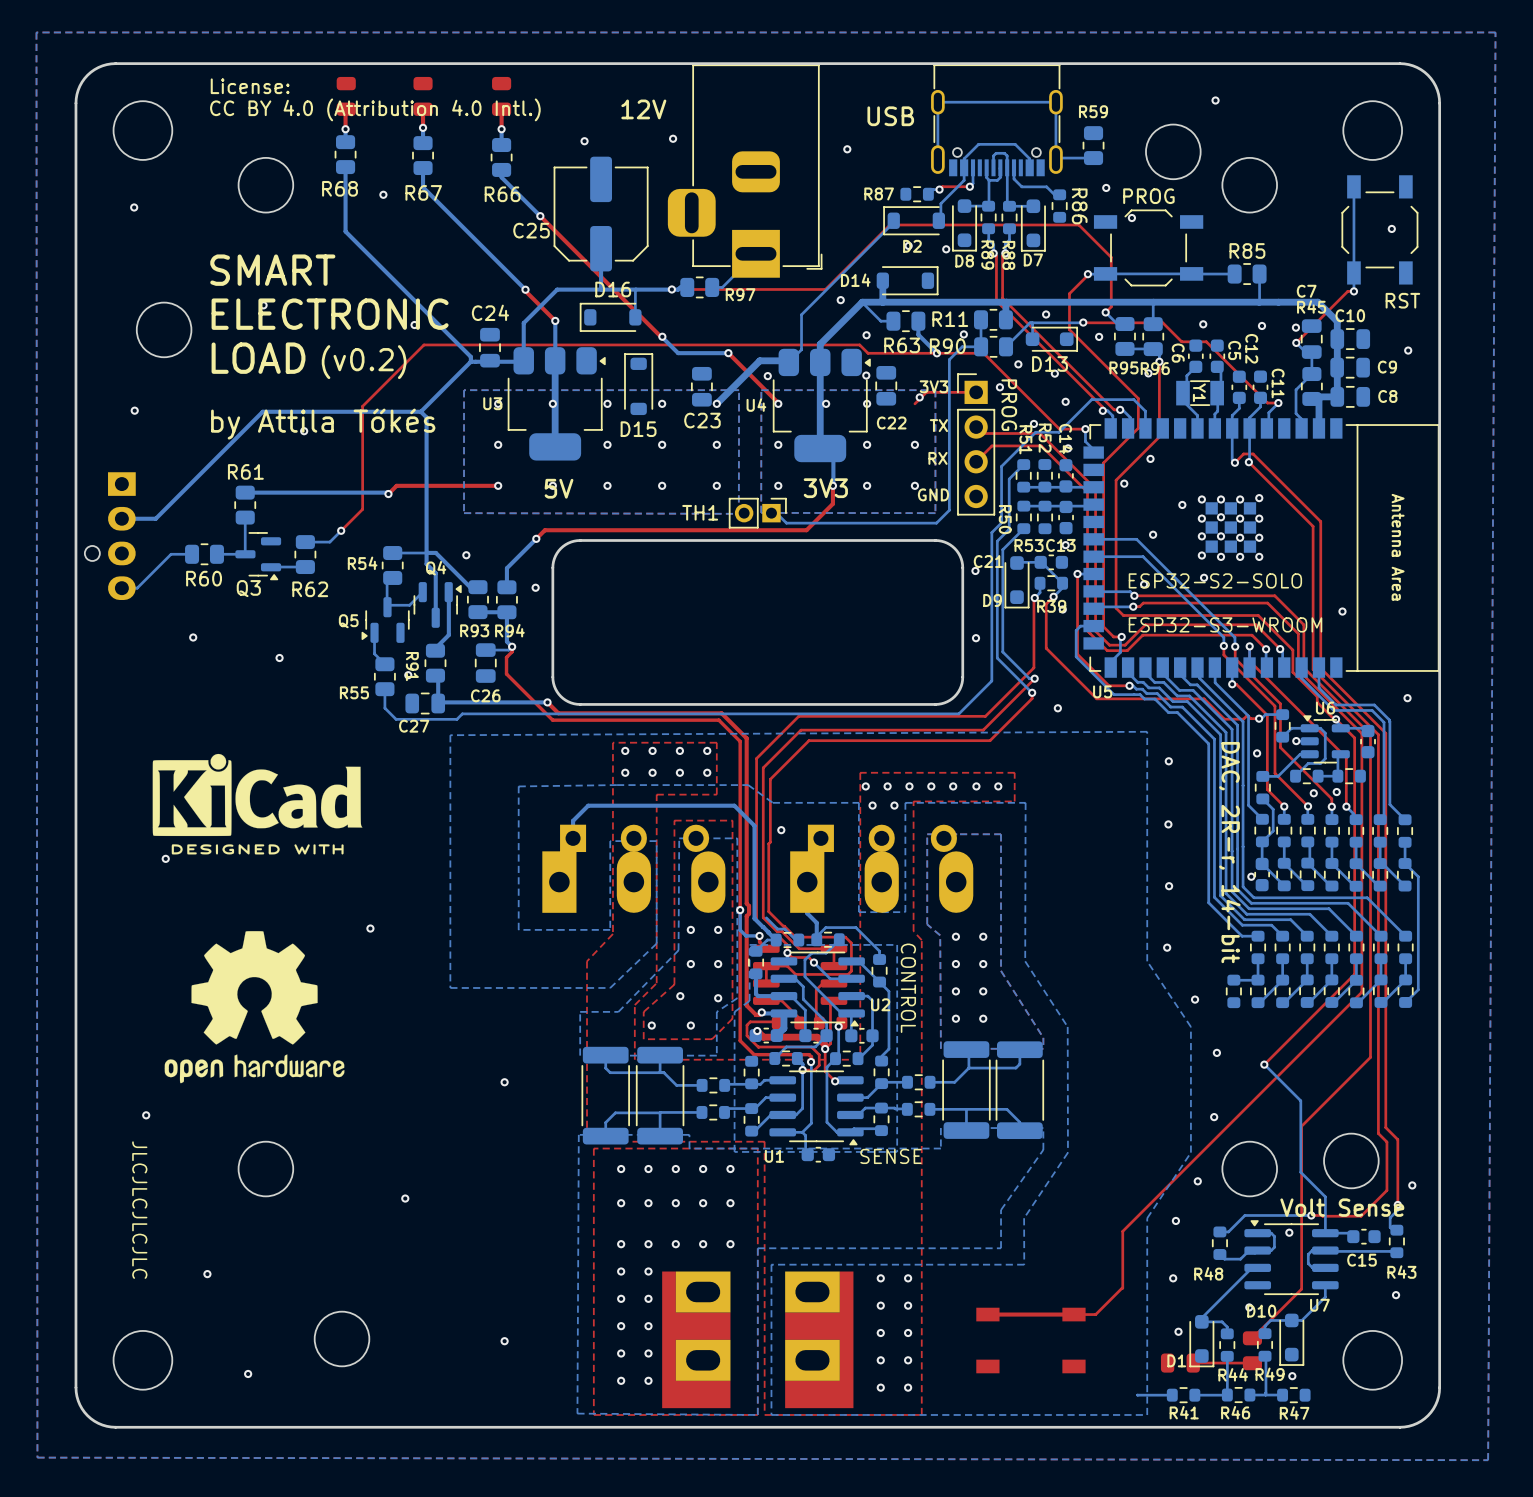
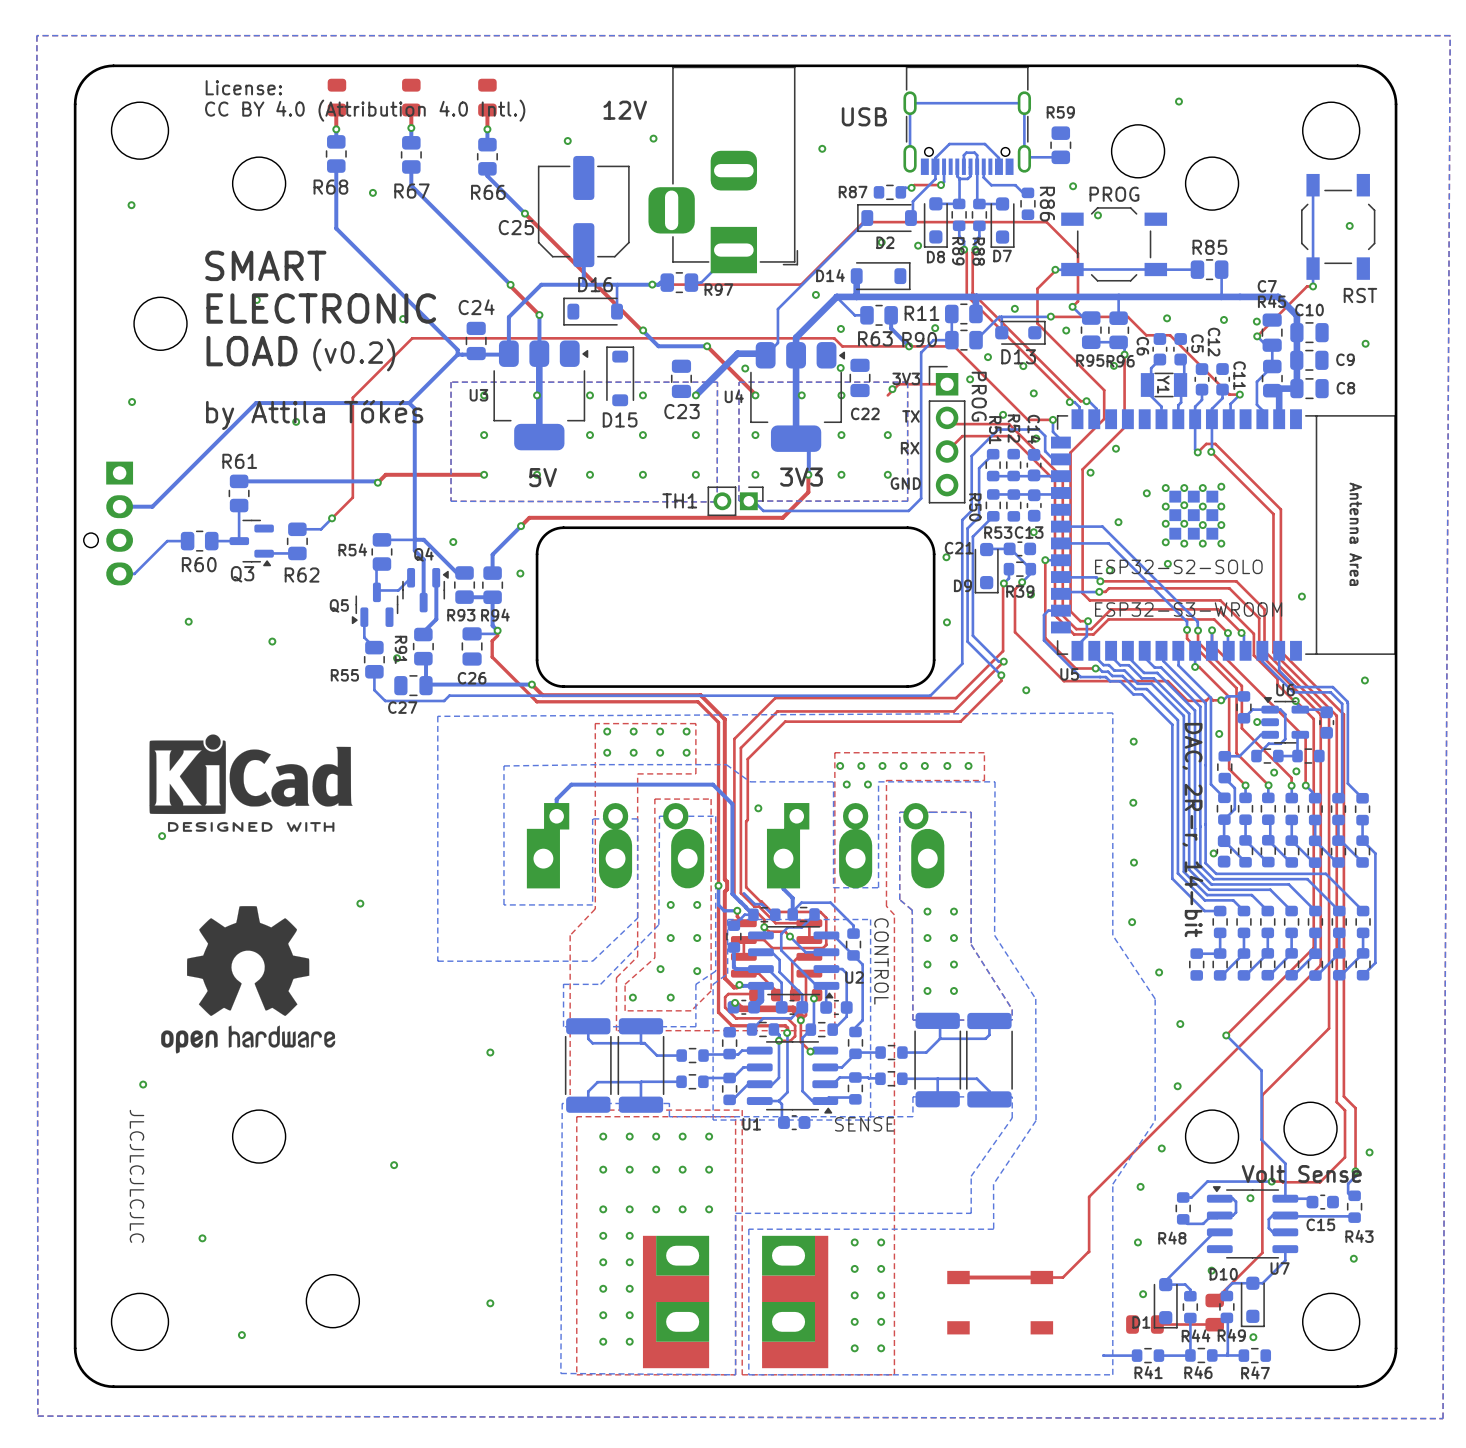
bottom track: (1145, 428) (1145, 411) (1133, 399) (1091, 399) (1059, 432) (1035, 432) (1028, 439) -> (1060, 459) (1053, 459) (1045, 451) (1045, 436) (1038, 429) (998, 429)

